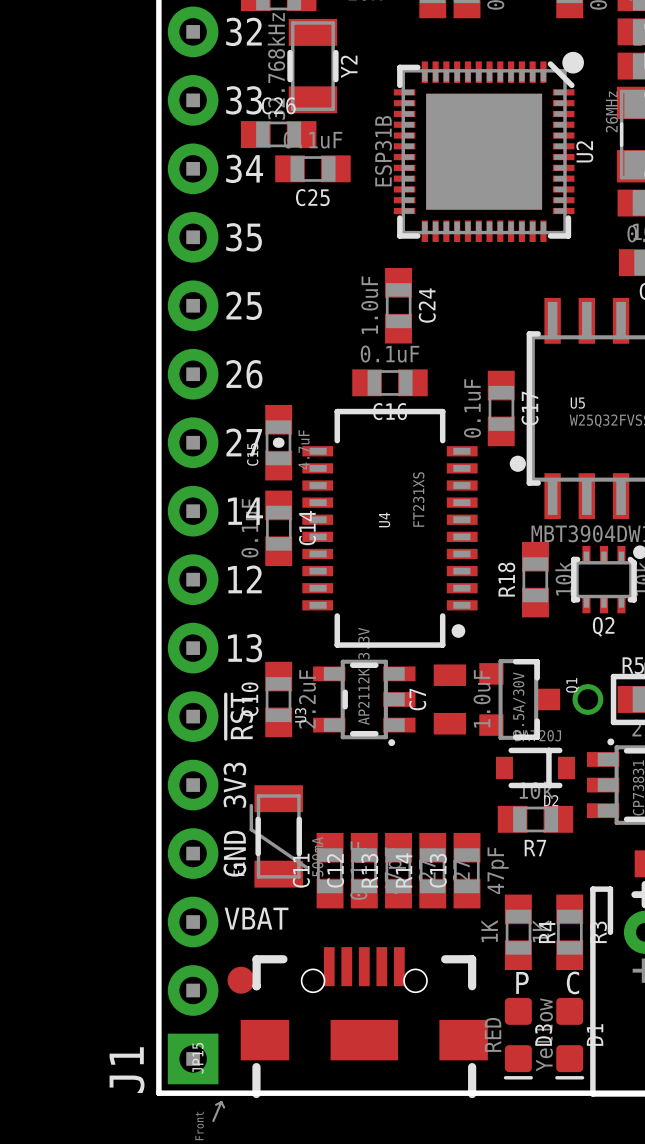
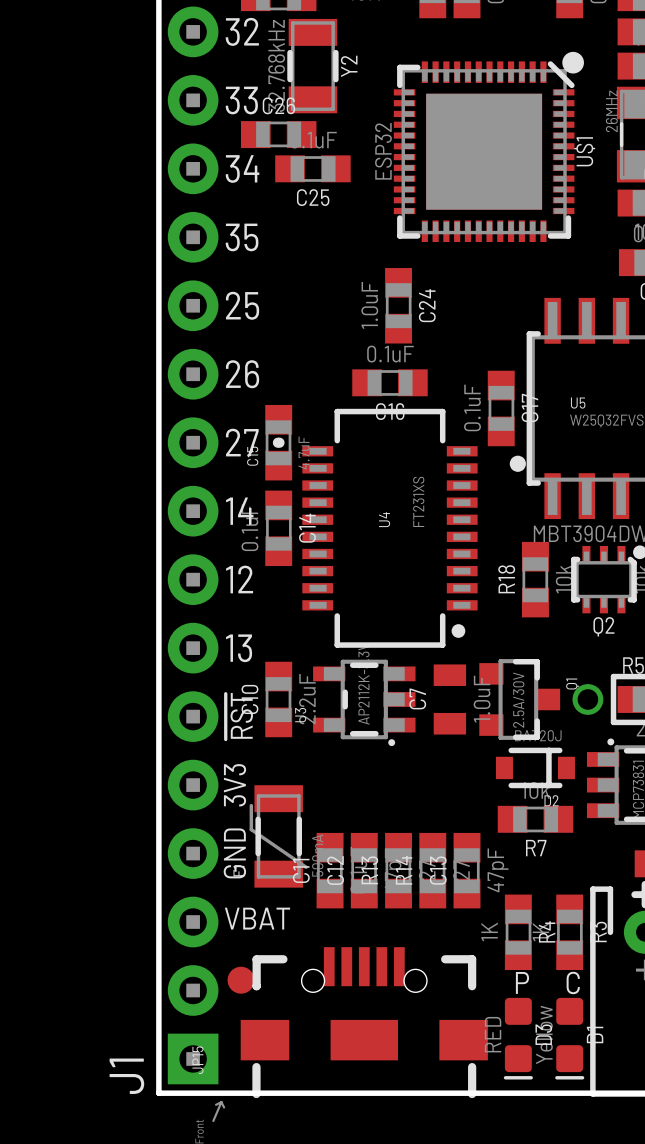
U2 value: ESP31B (383, 151) -> ESP32 (383, 151)
U2 name: U2 (584, 151) -> U$1 (584, 151)

